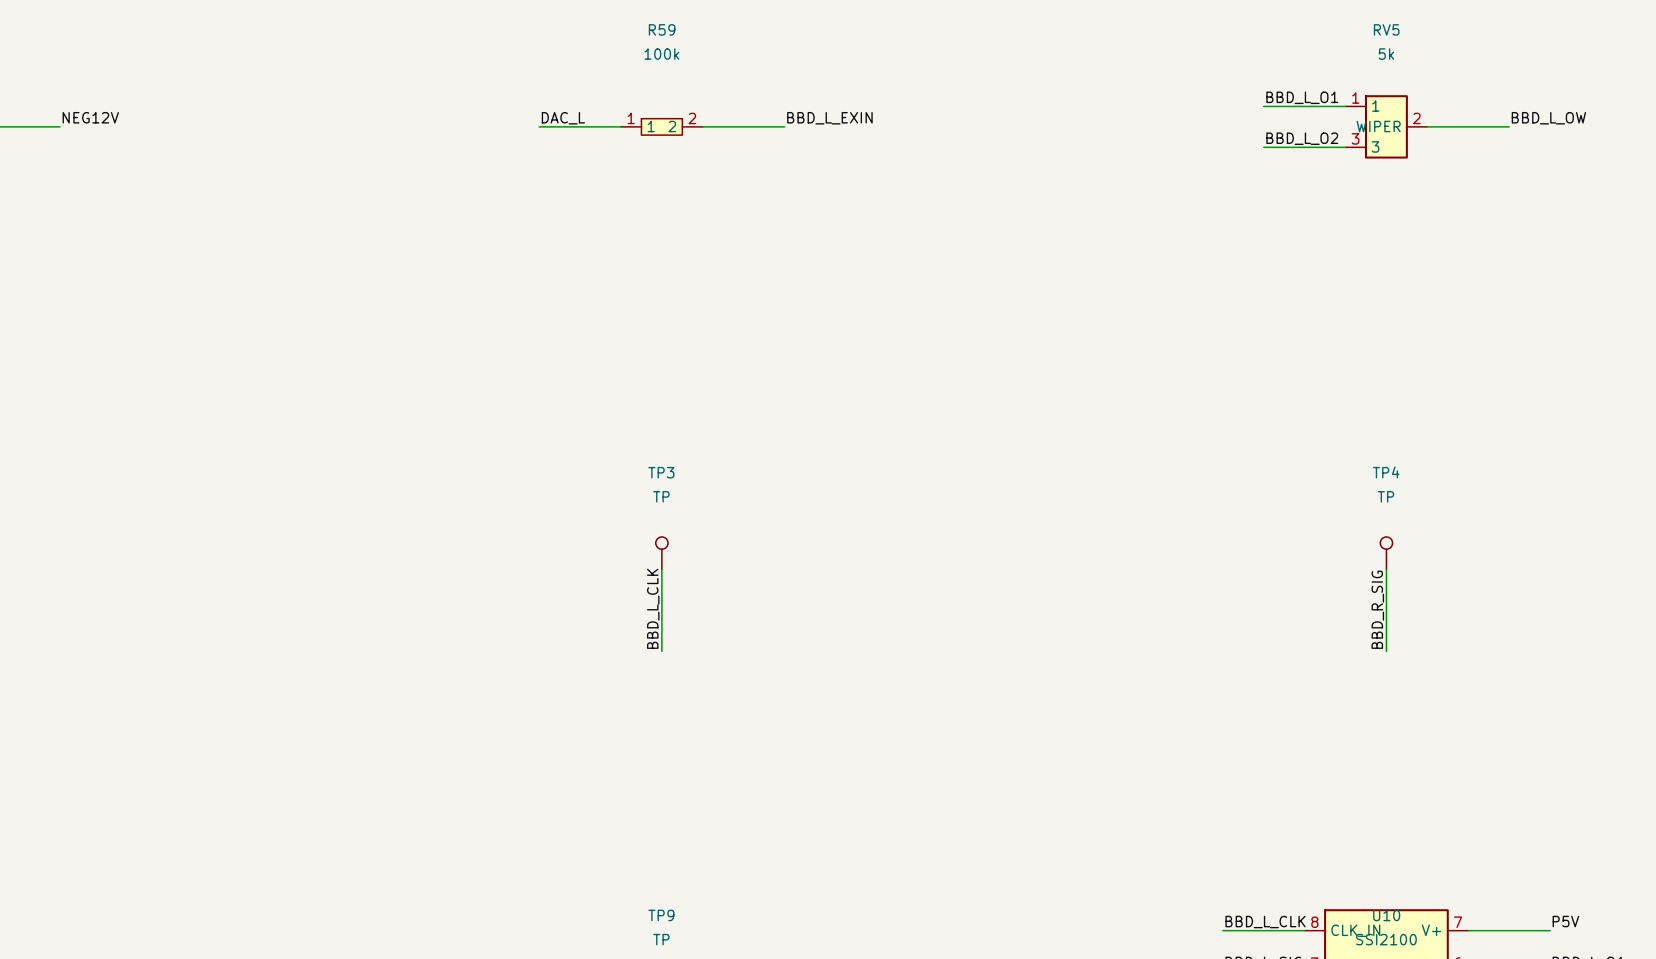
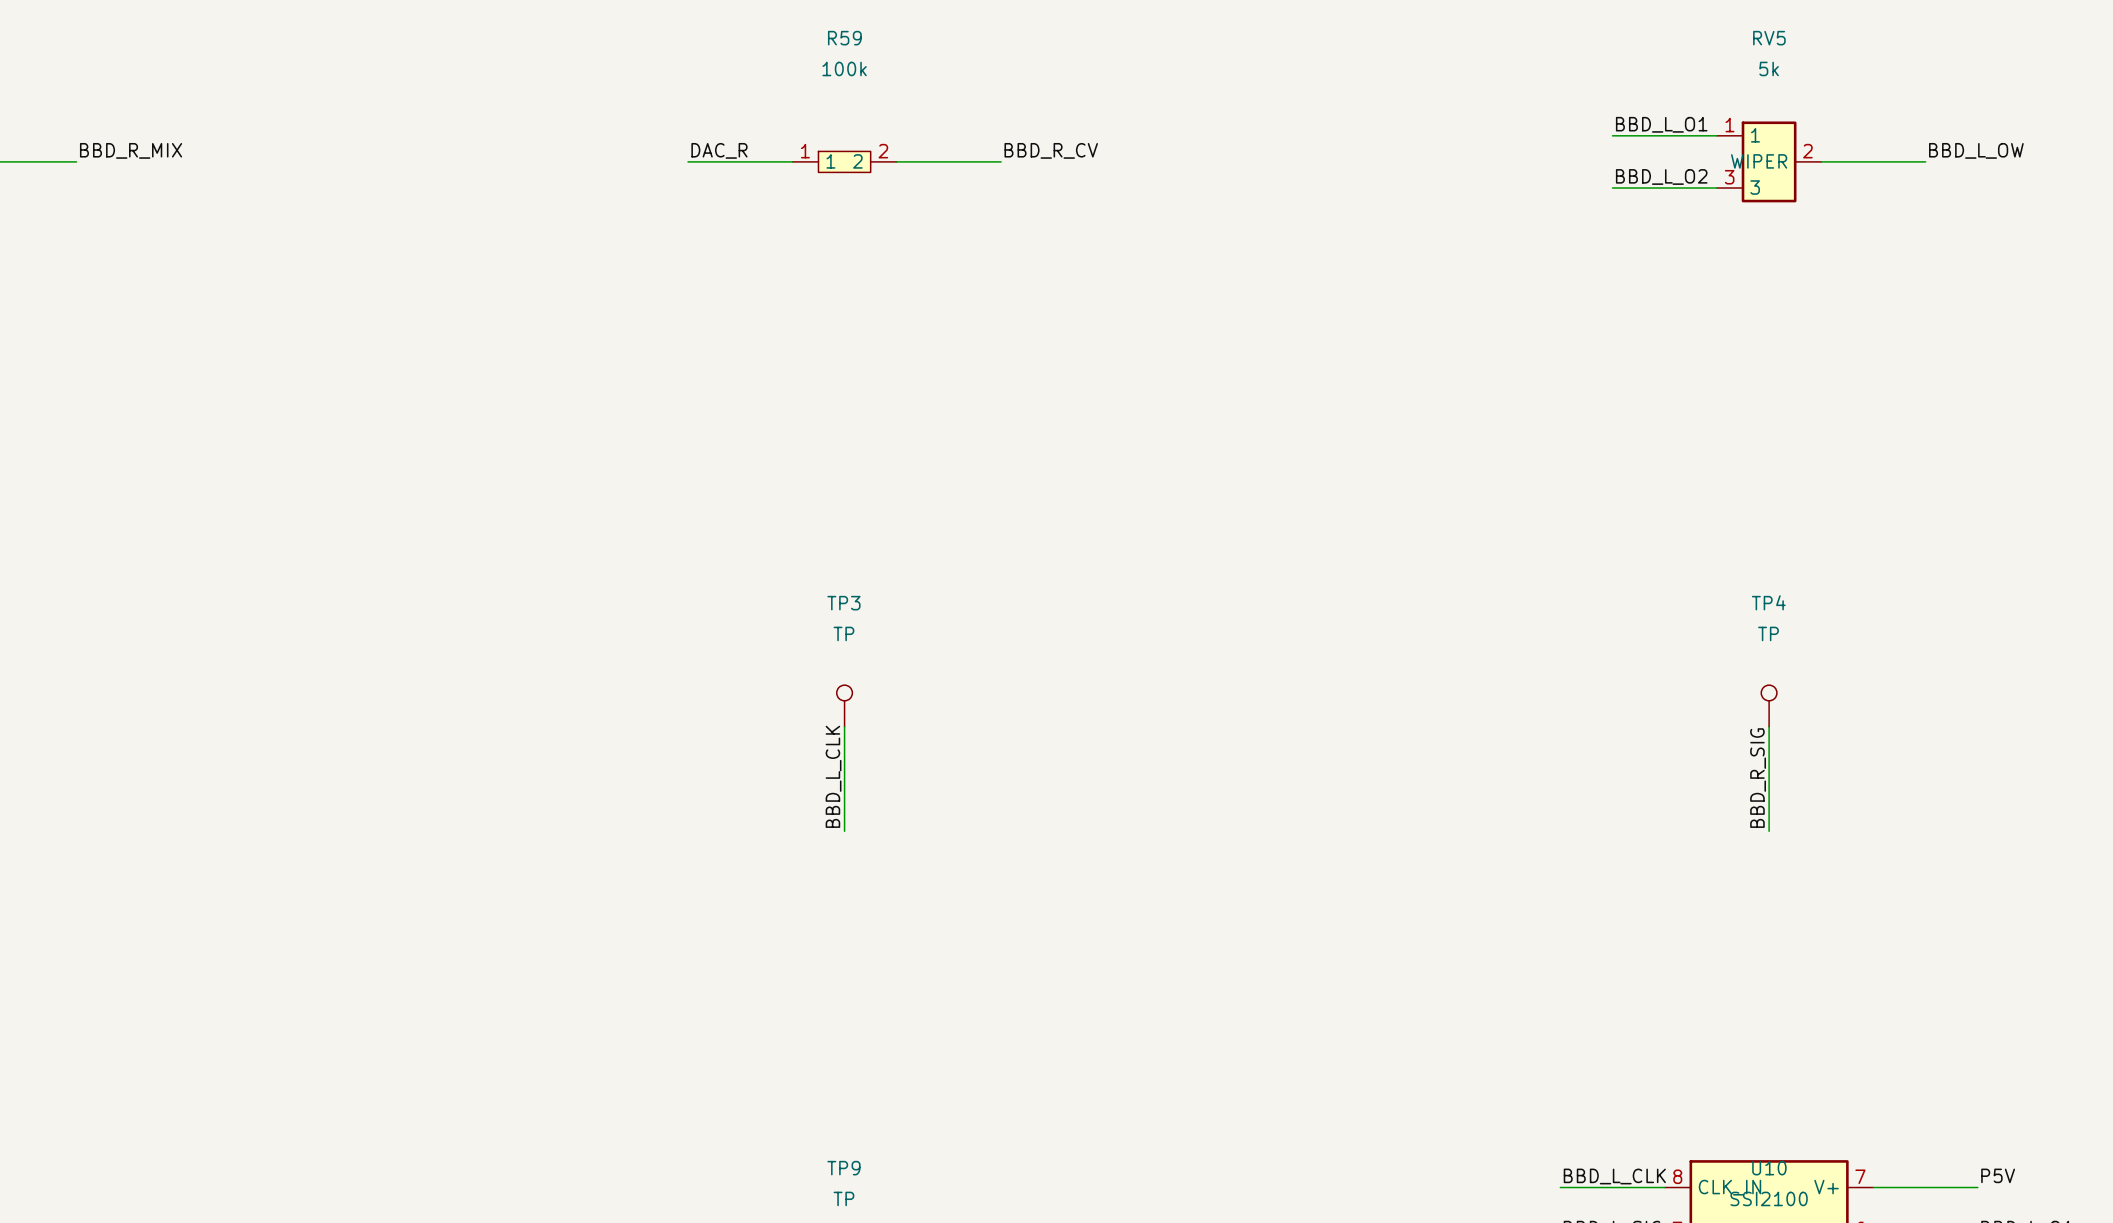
label: NEG12V (90, 117) -> BBD_R_MIX (131, 150)
label: DAC_L (563, 118) -> DAC_R (719, 150)
label: BBD_L_EXIN (829, 118) -> BBD_R_CV (1051, 150)

